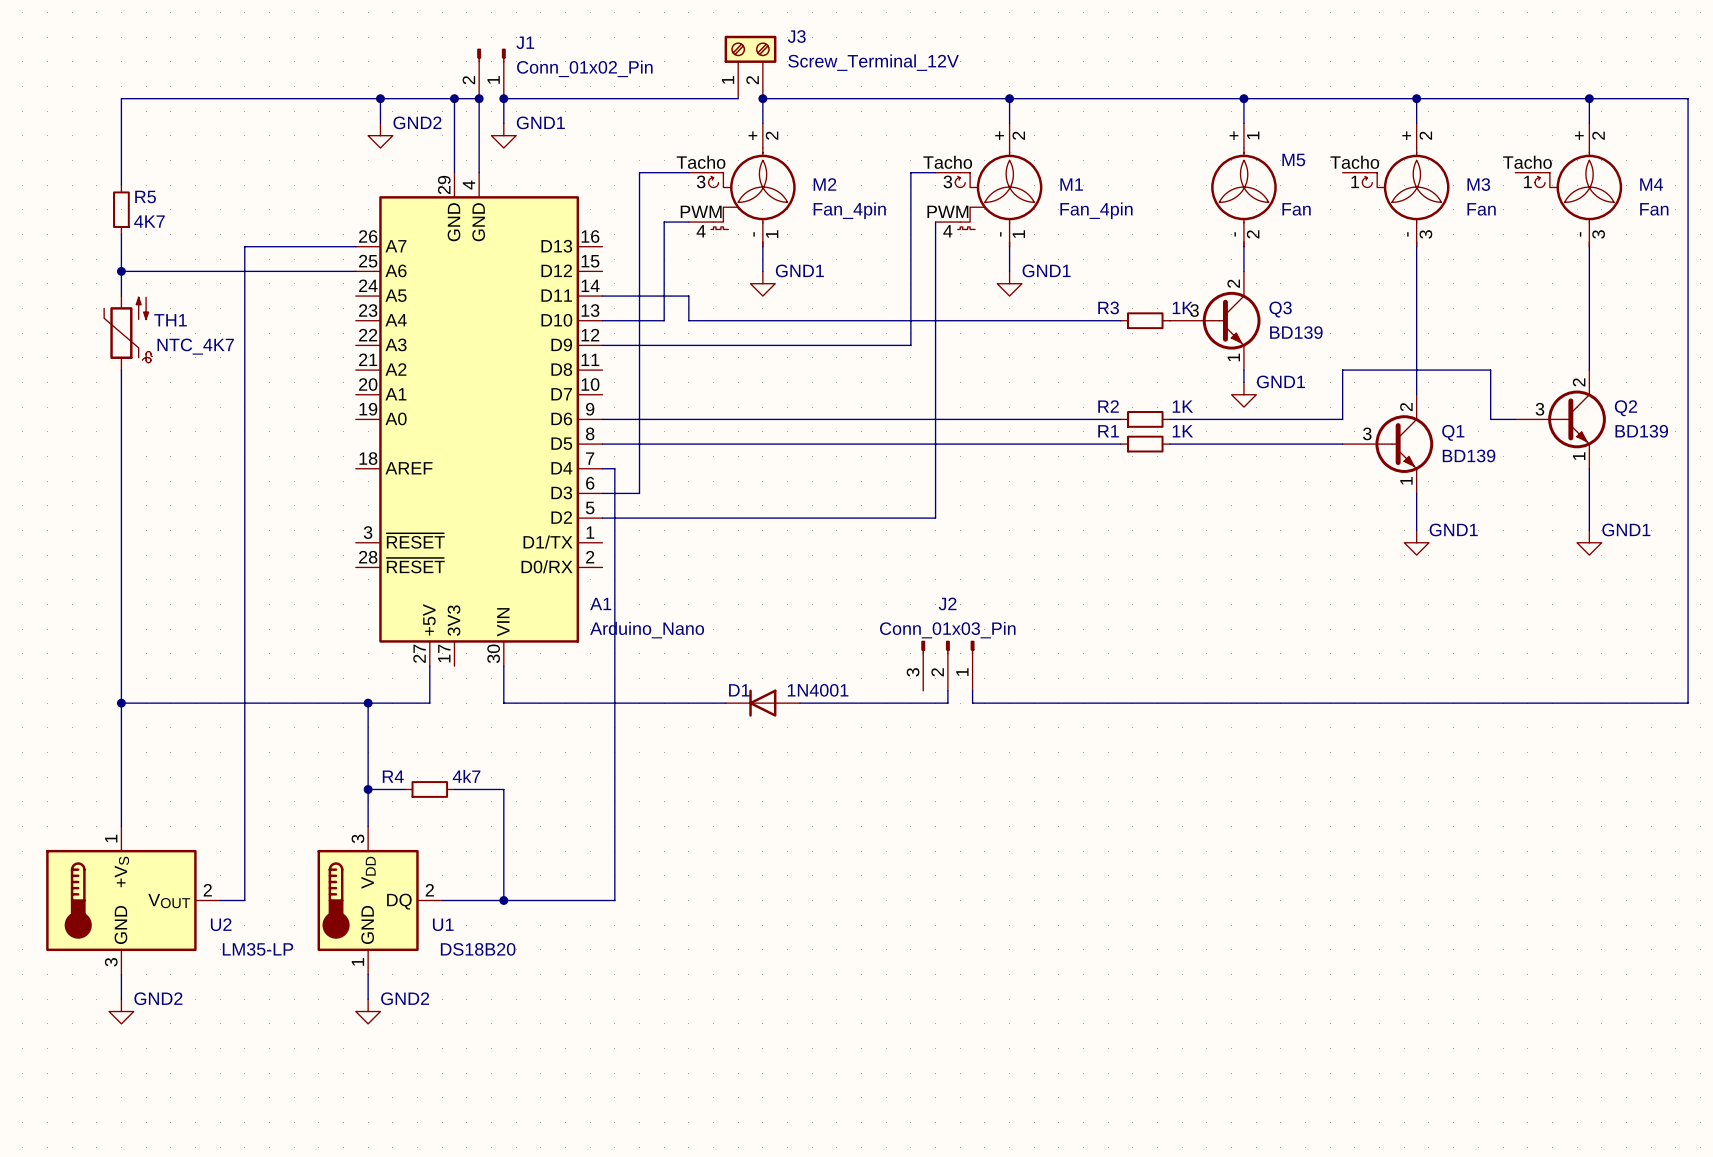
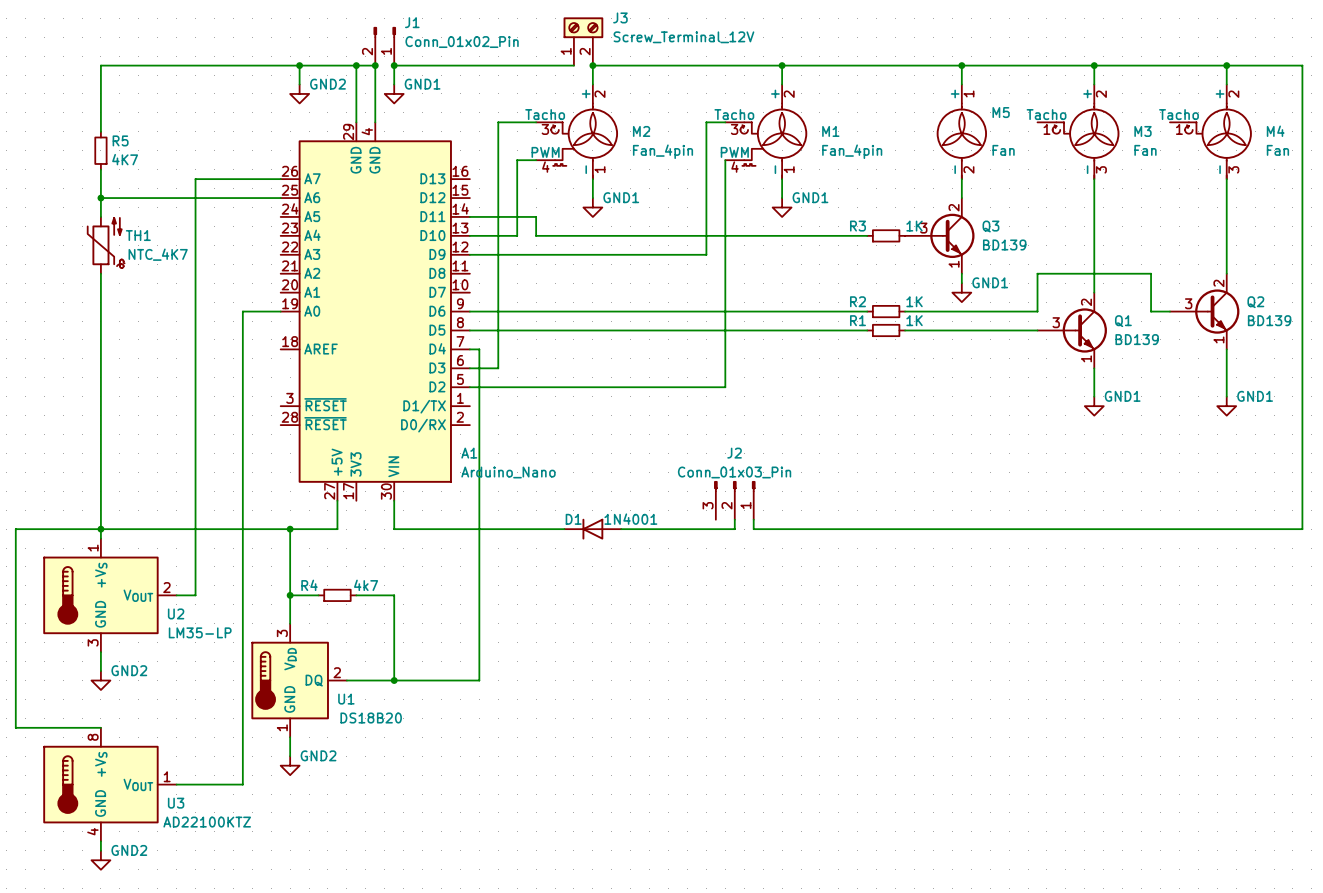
wire: none -> (280, 311) (242, 311) (242, 784) (176, 784)
wire: none -> (100, 529) (15, 529) (15, 727) (100, 727)
wire: (244, 789) (244, 900) (220, 900) -> (195, 595) (176, 595)
power symbol: none -> GND2 (100, 680)
U2 position: (133, 900) -> (109, 595)
power symbol: GND2 (121, 1011) -> none
U3: none -> AD22100KTZ (109, 784)
wire: none -> (100, 841) (100, 850)
power symbol: none -> GND2 (100, 860)

